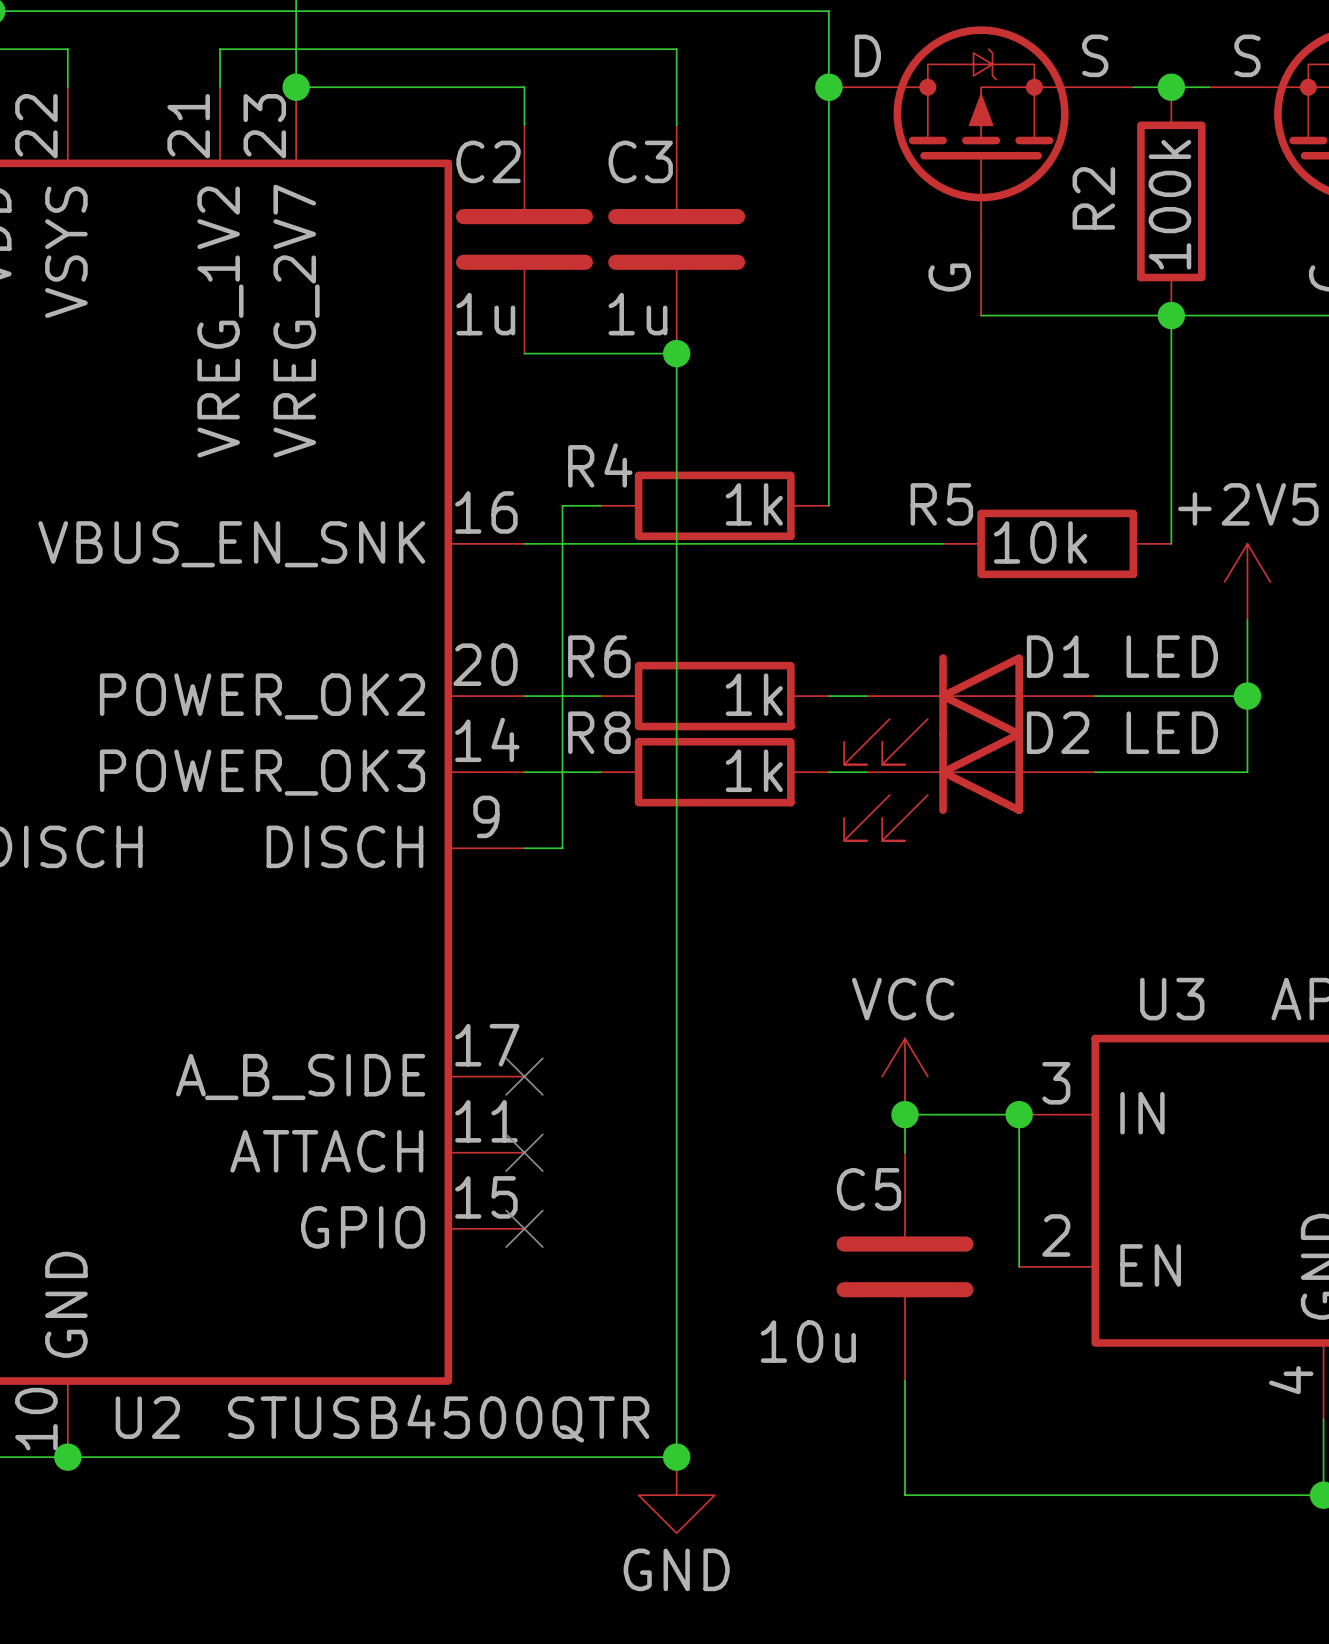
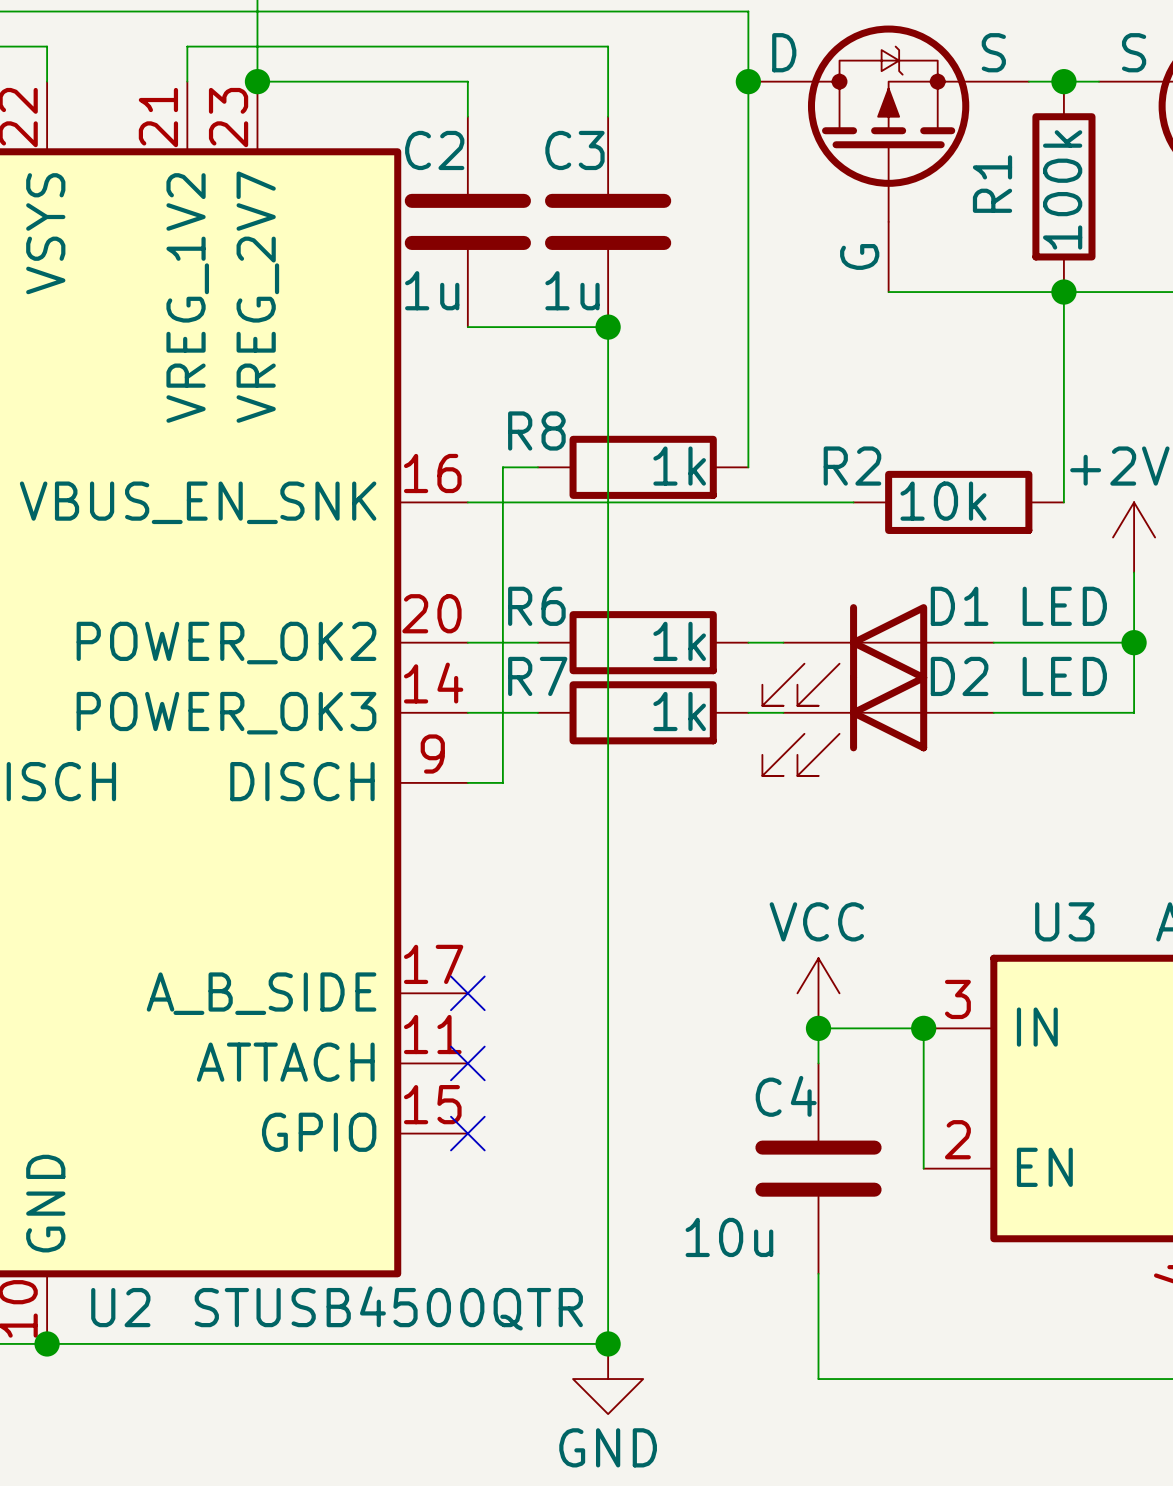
R2 name: R2 (1093, 198) -> R1 (992, 184)
R4 name: R4 (600, 465) -> R8 (536, 430)
R5 name: R5 (941, 504) -> R2 (852, 466)
R8 name: R8 (599, 732) -> R7 (537, 676)
C5 name: C5 (869, 1189) -> C4 (786, 1096)

